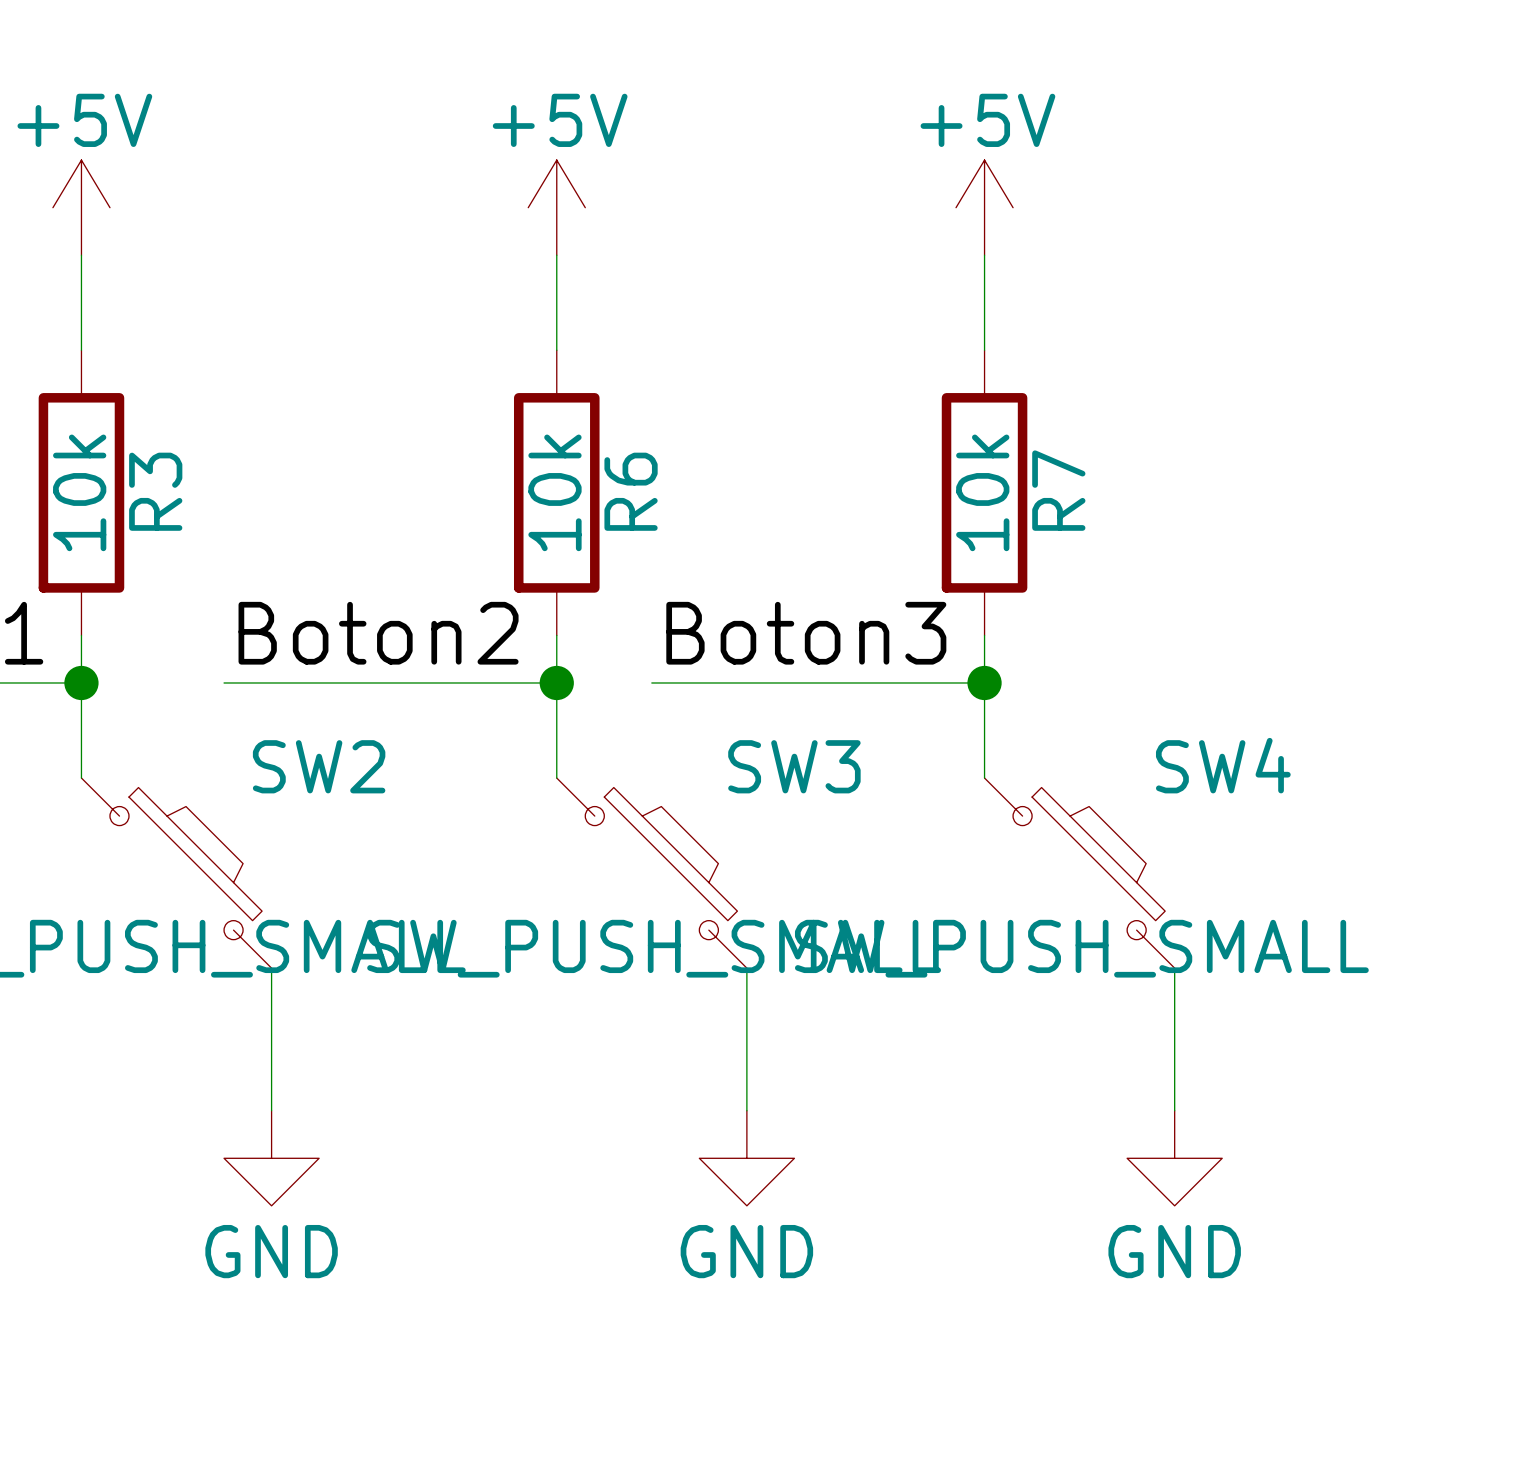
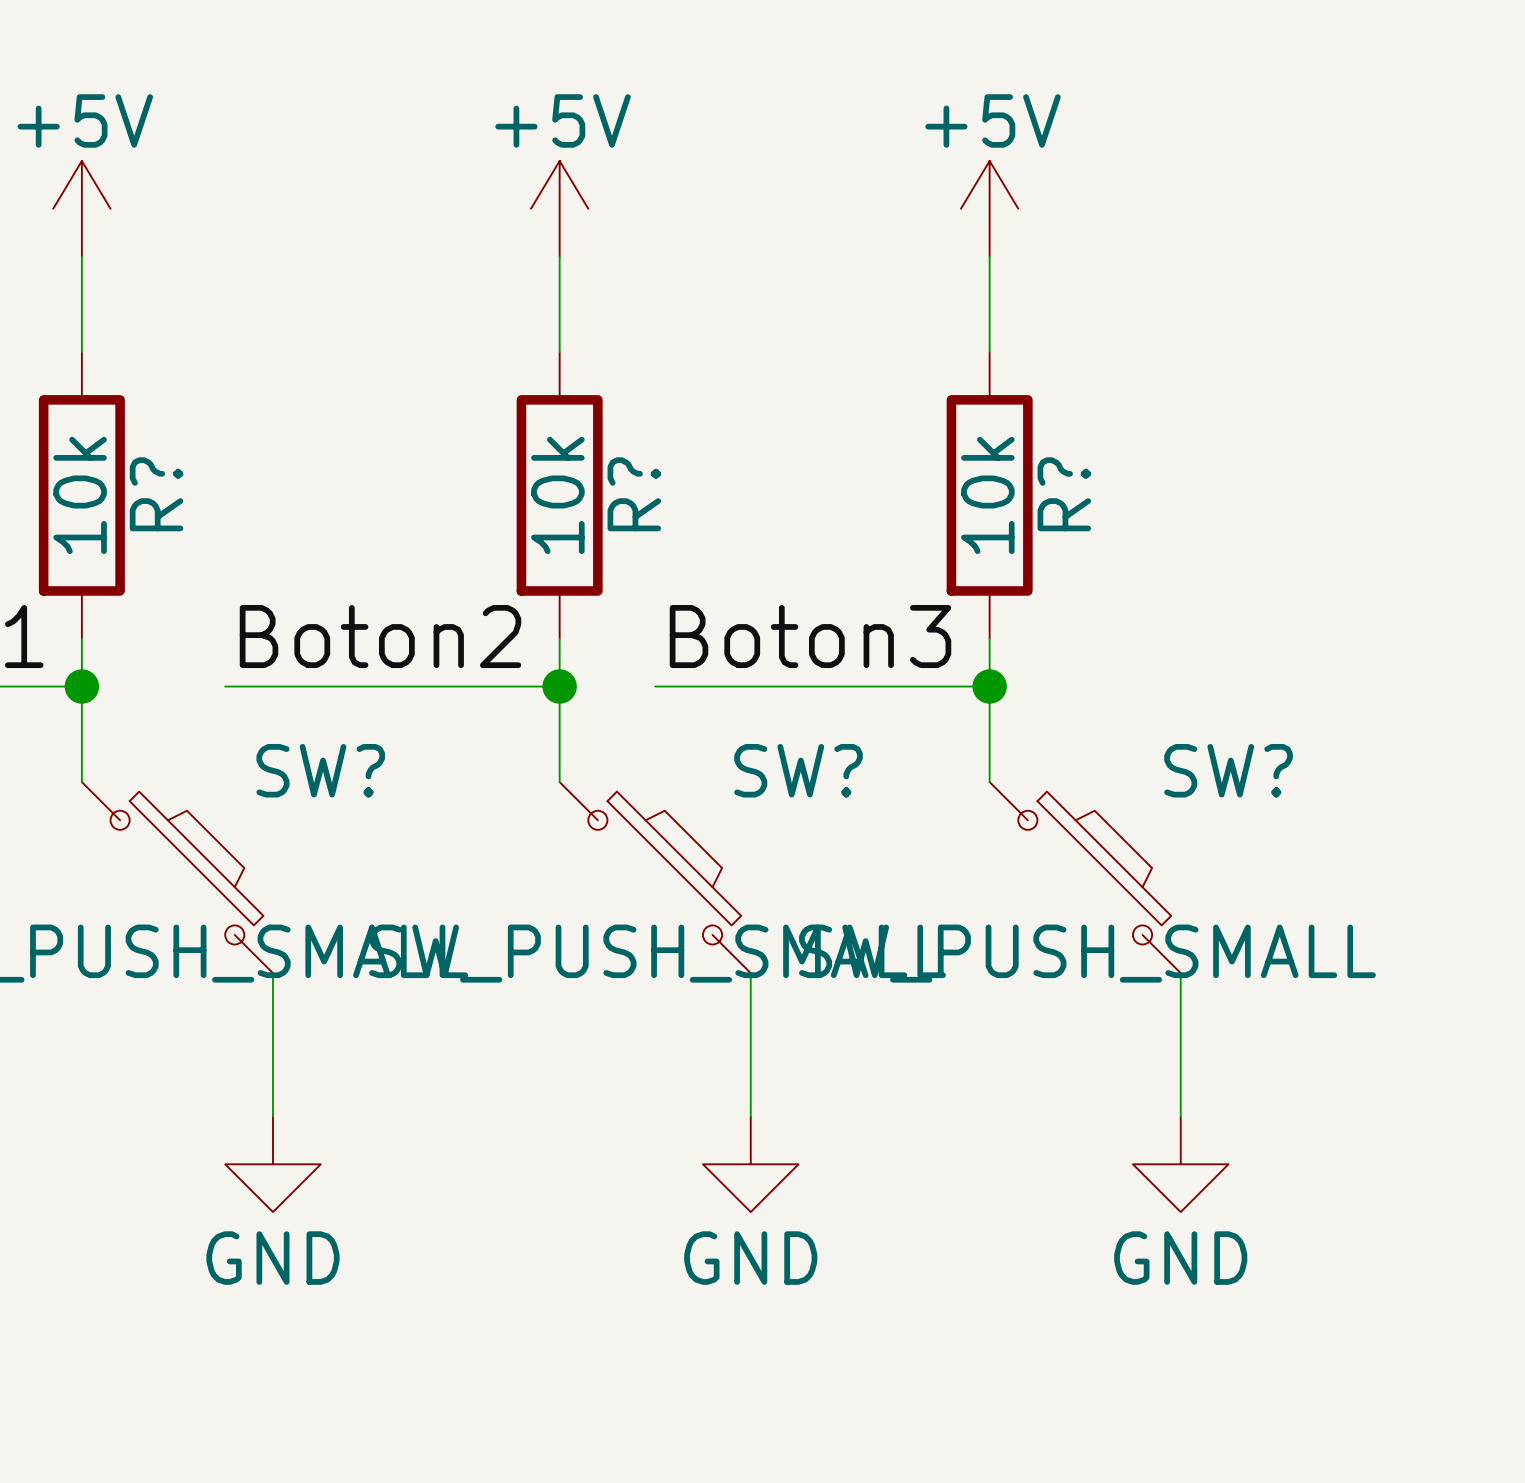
R7 name: R7 (1058, 490) -> R? (1064, 494)
R3 name: R3 (155, 491) -> R? (156, 494)
R6 name: R6 (631, 491) -> R? (634, 494)
SW4 name: SW4 (1223, 765) -> SW? (1228, 770)
SW2 name: SW2 (319, 766) -> SW? (320, 770)
SW3 name: SW3 (794, 766) -> SW? (798, 770)

